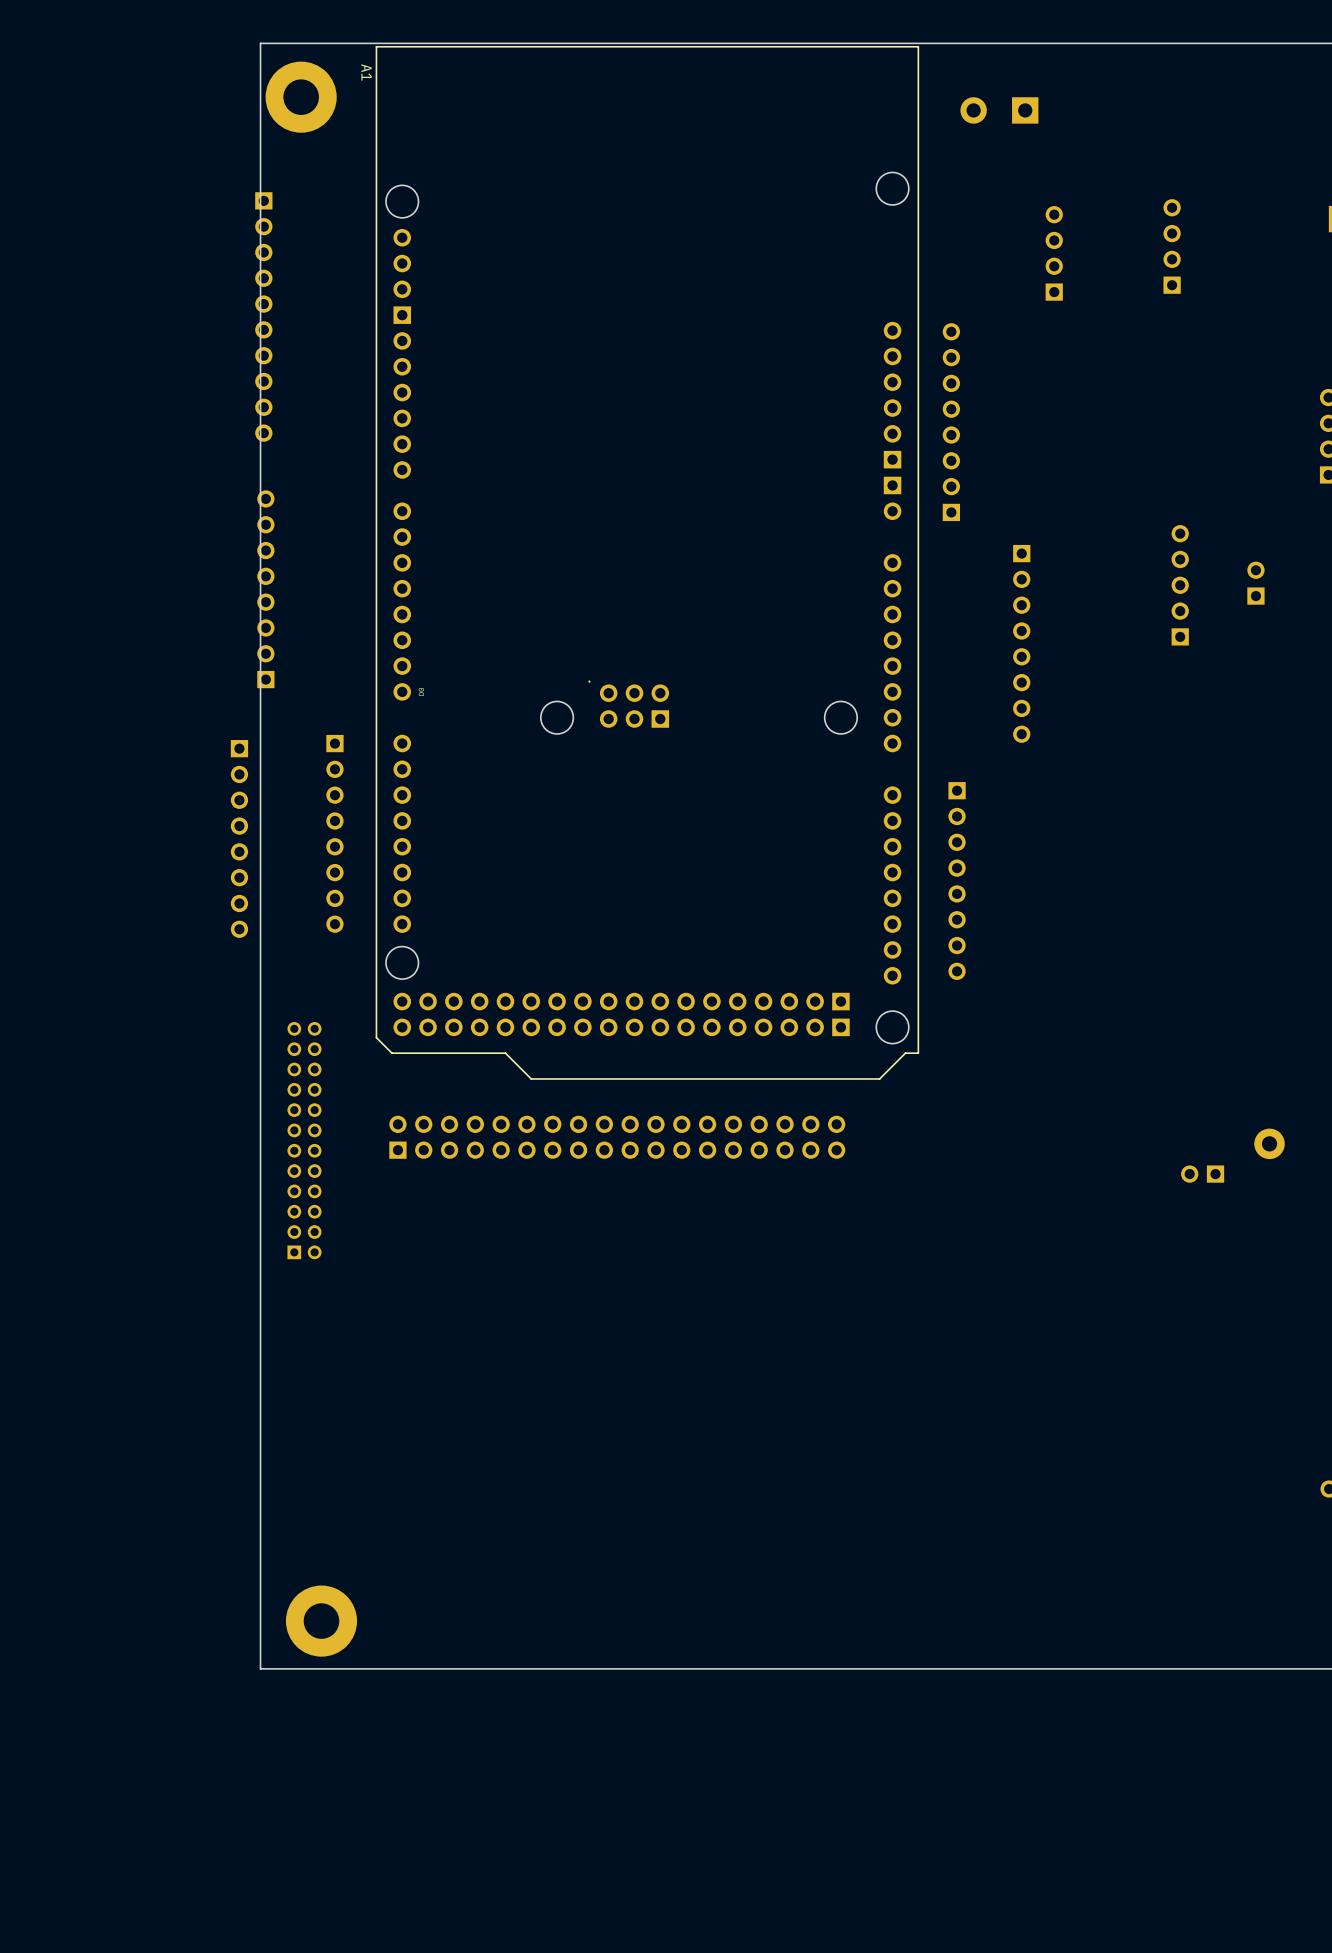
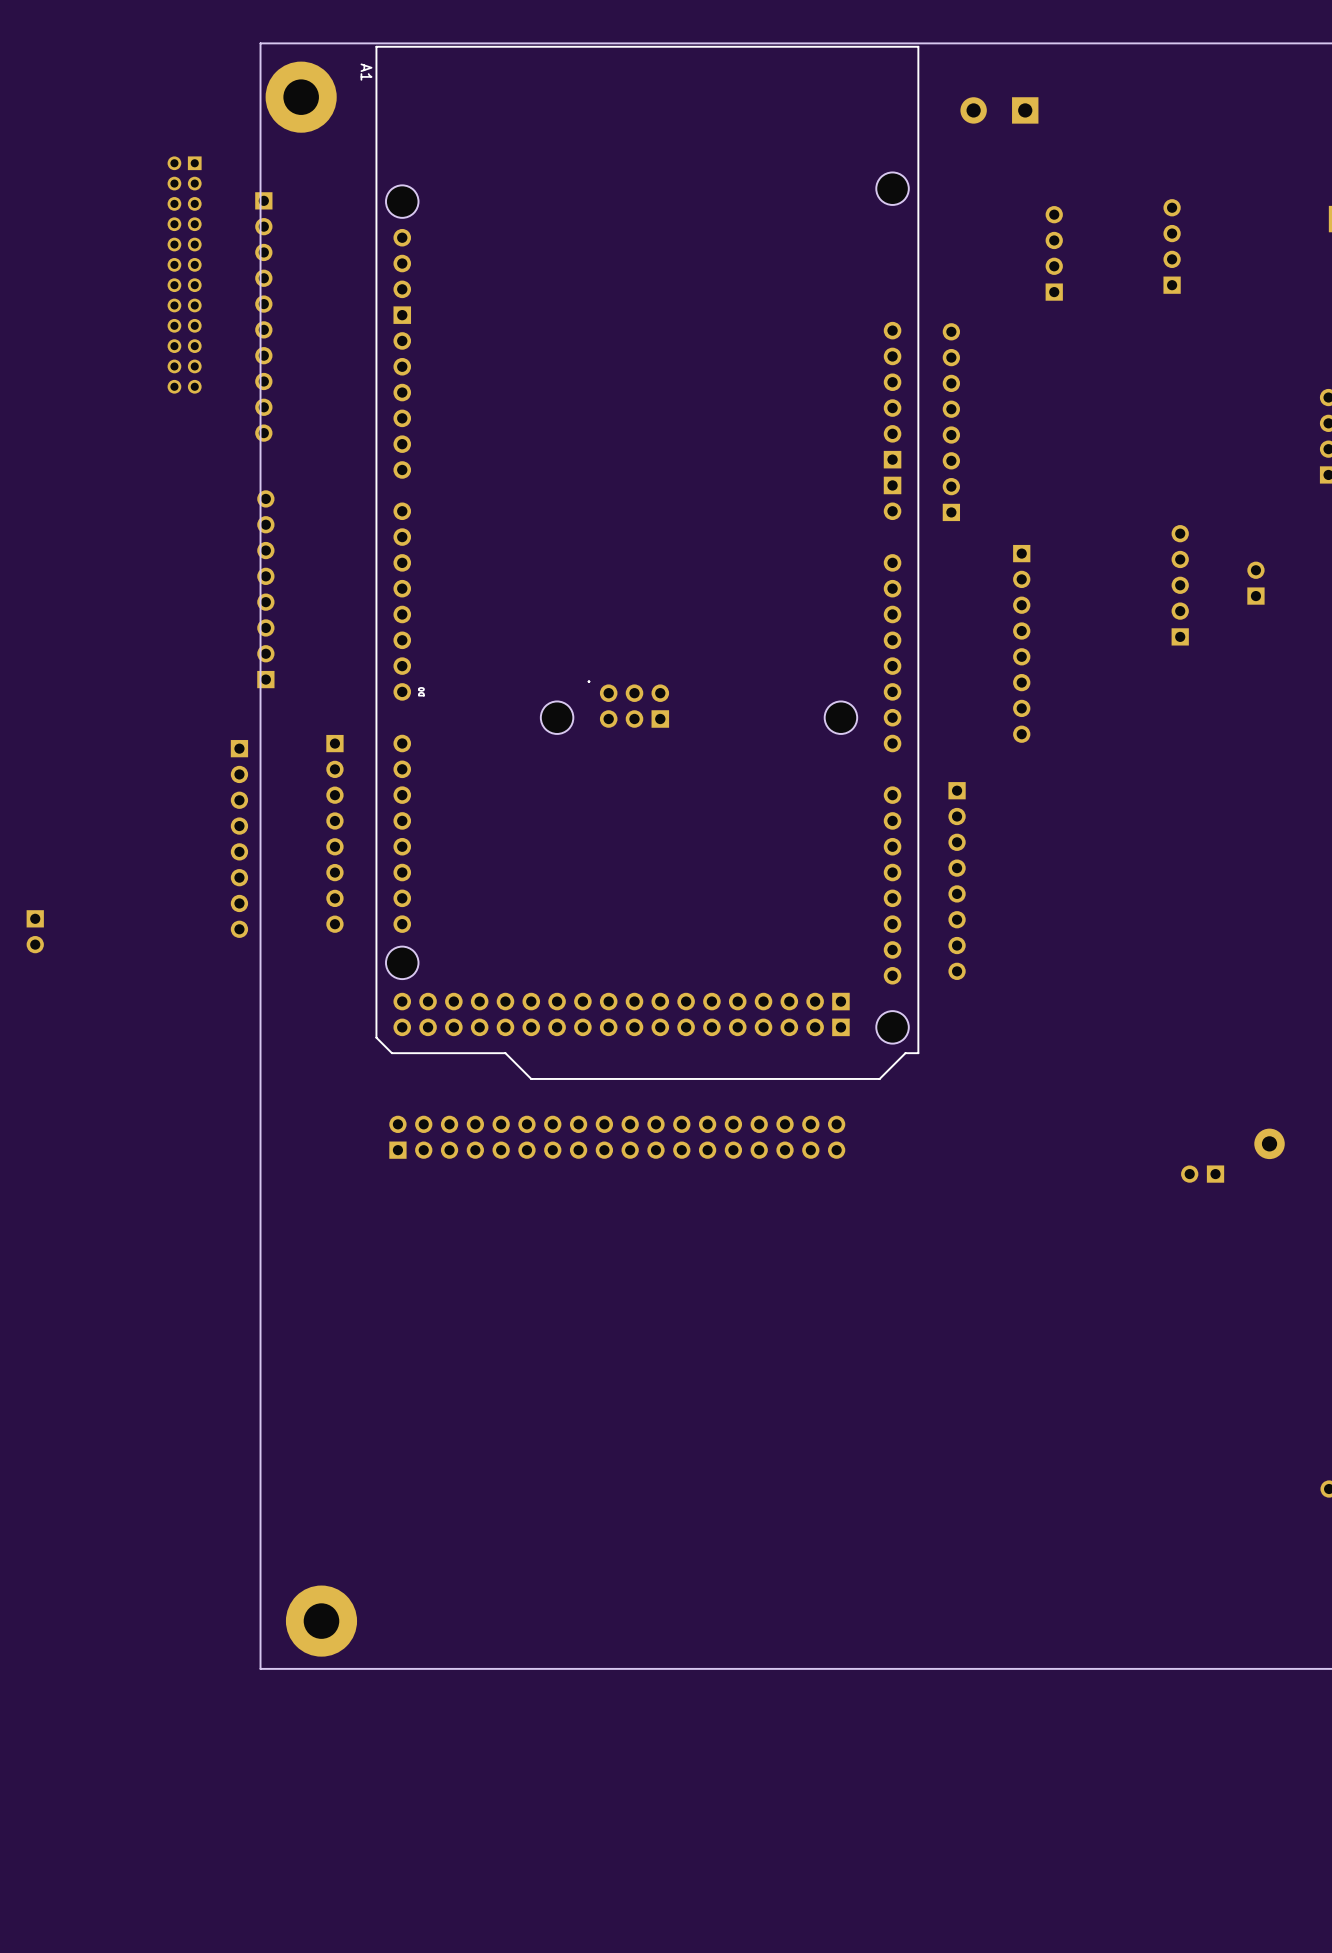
part: none -> (184, 275)
part: none -> (35, 931)
part: (304, 1140) -> none

